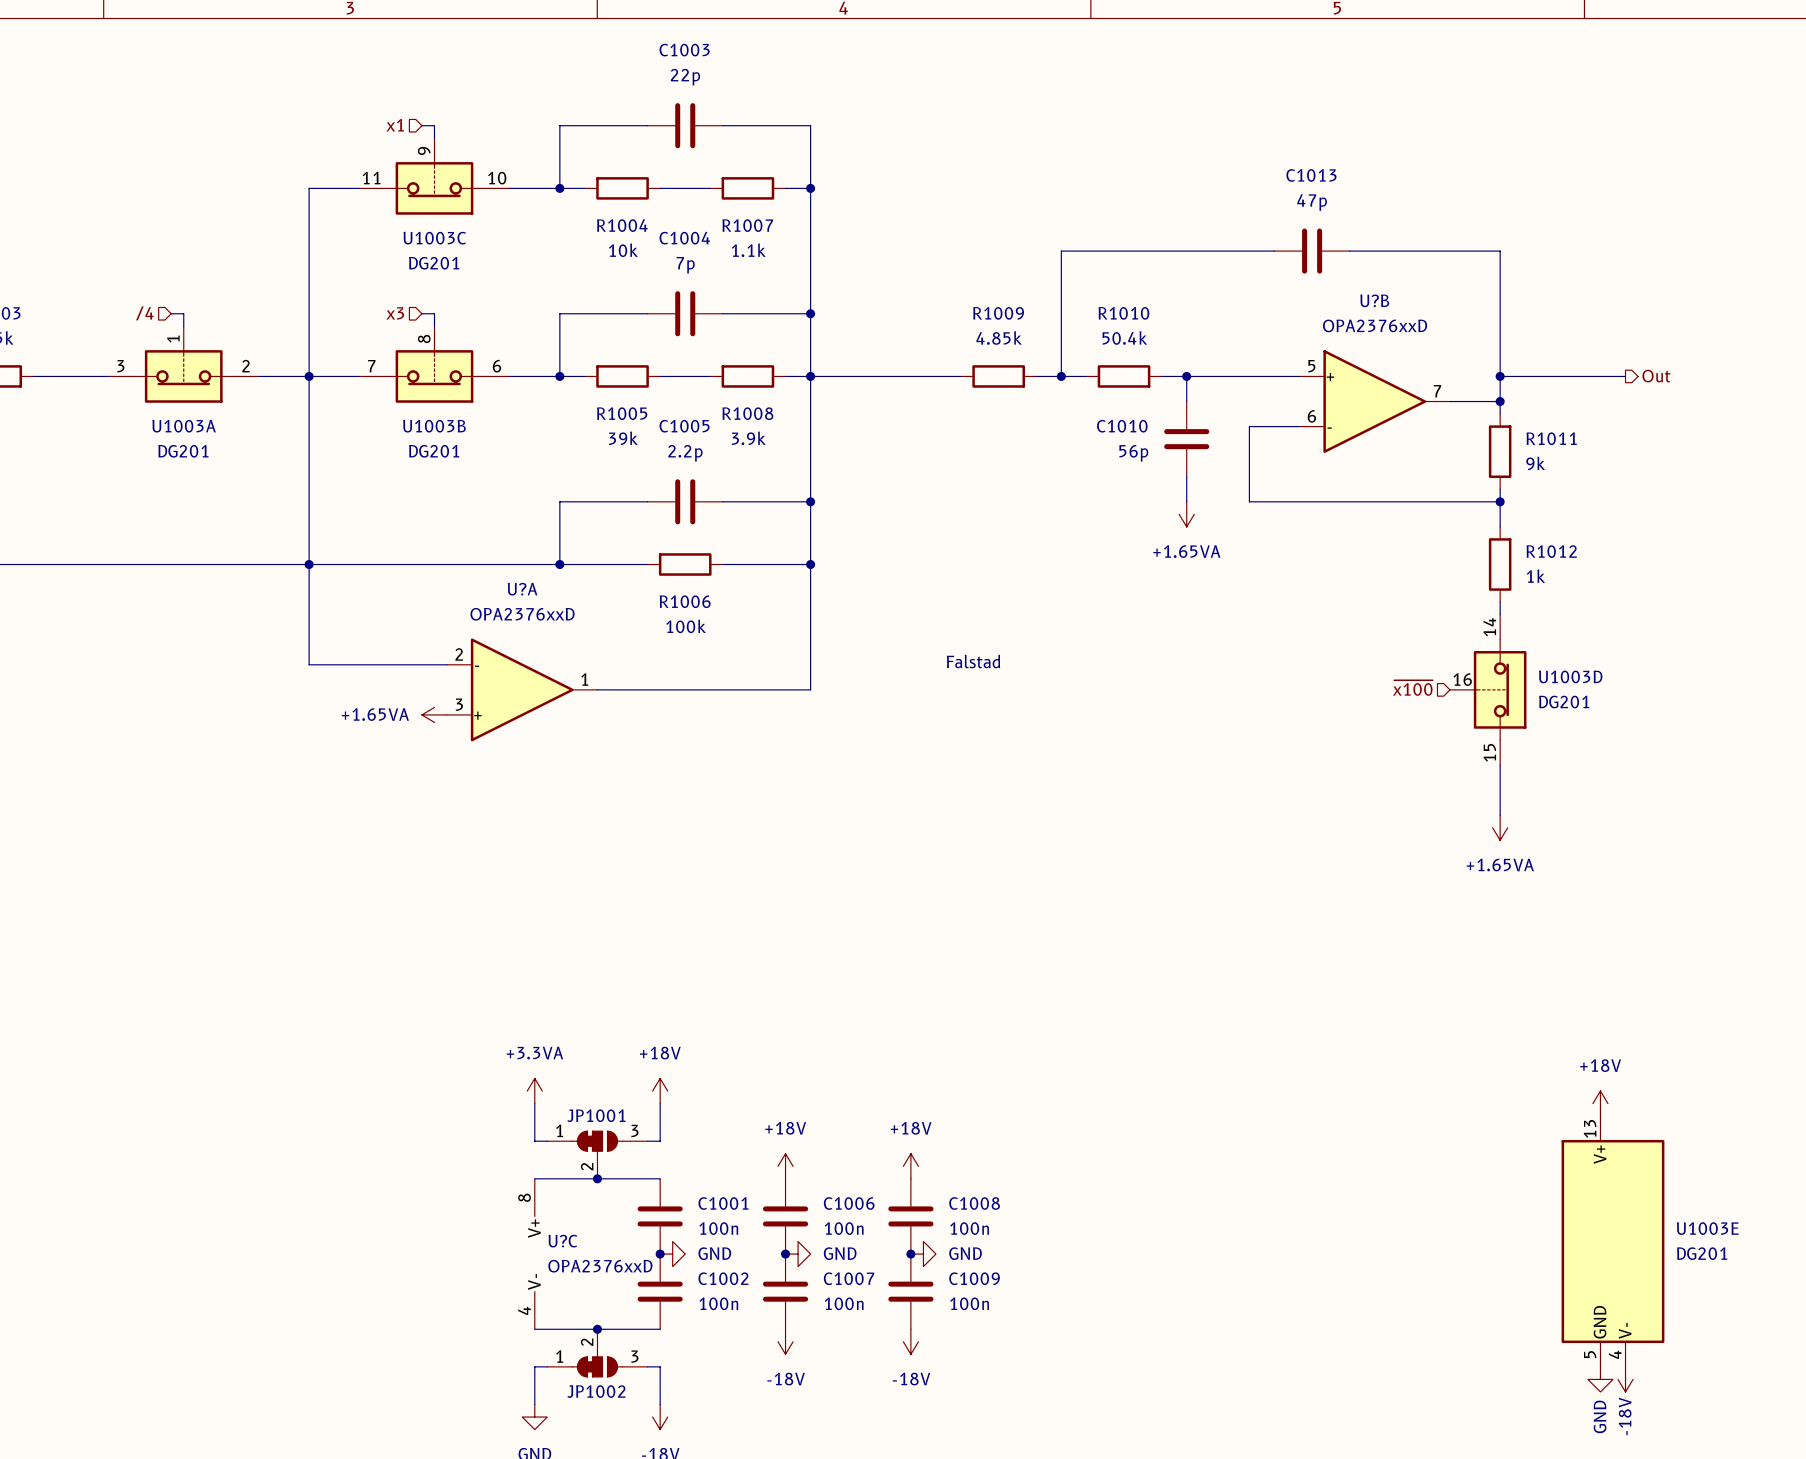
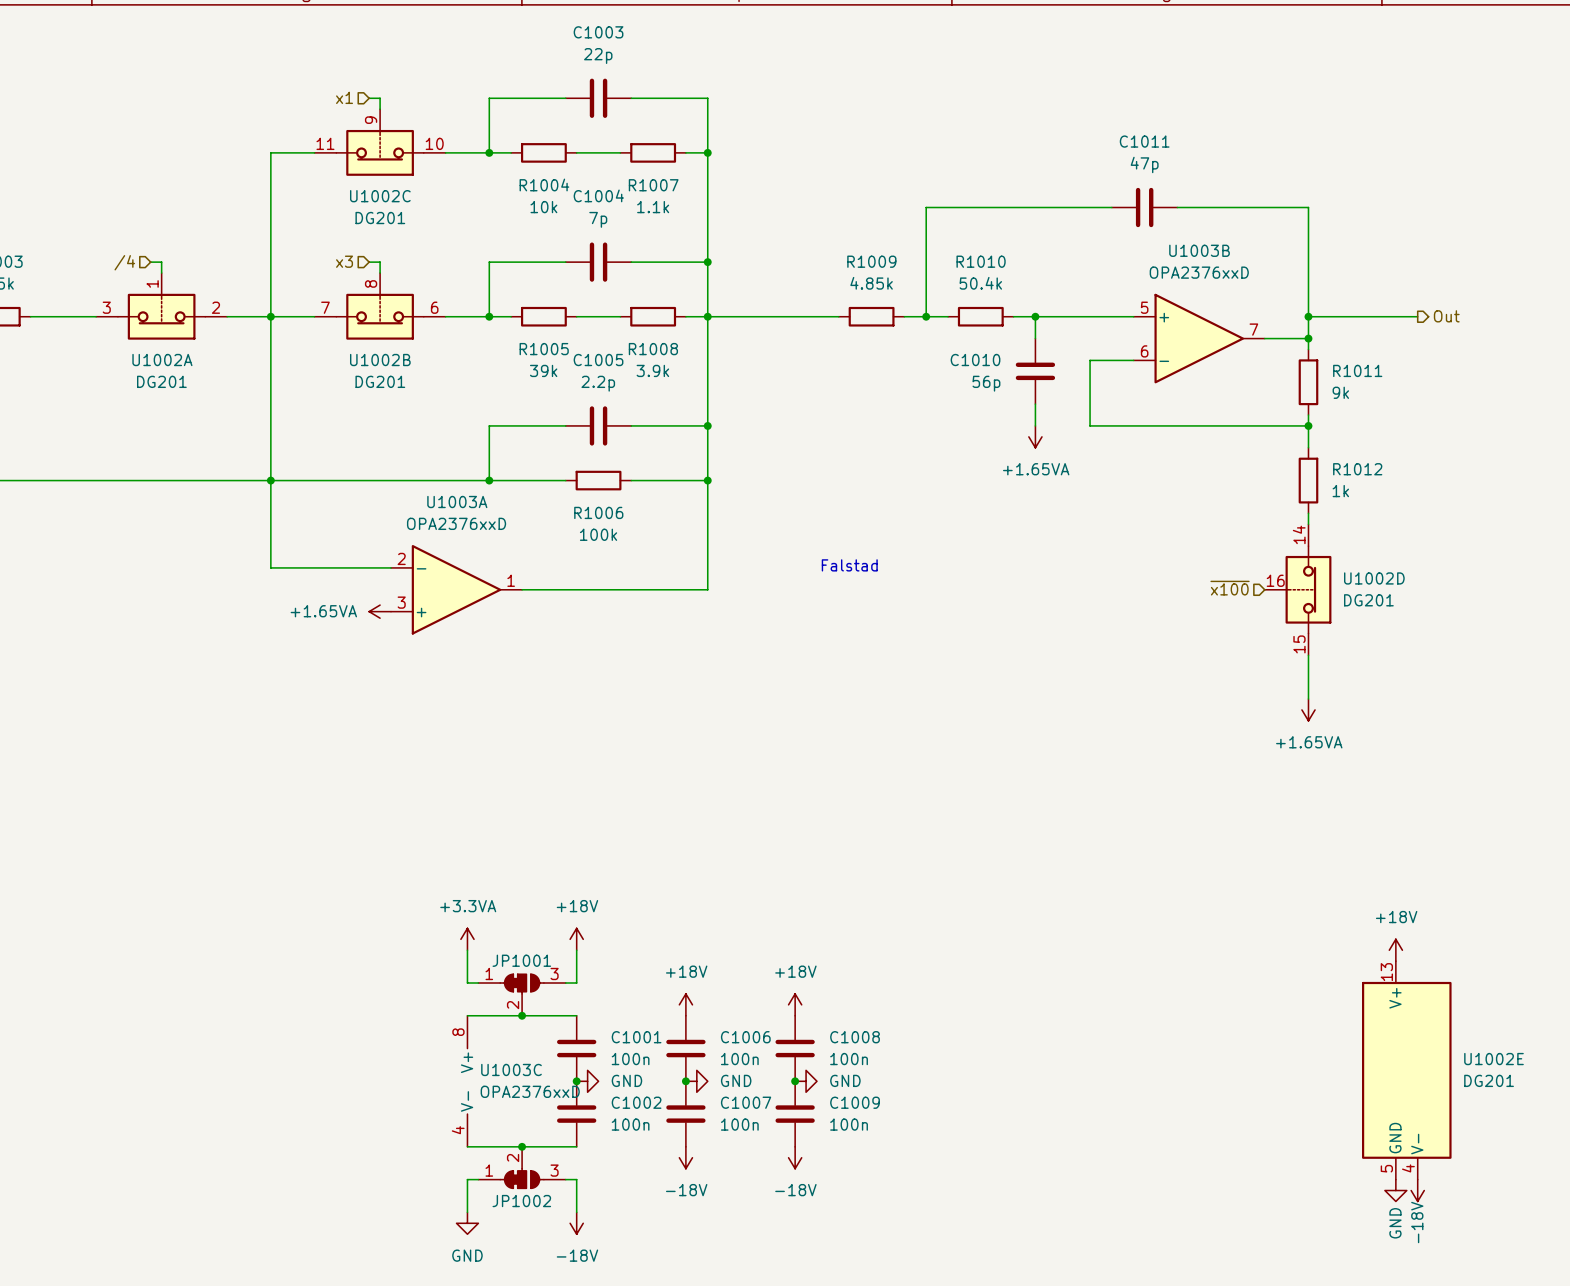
C1013 name: C1013 (1311, 175) -> C1011 (1144, 141)
U1003C name: U1003C (434, 238) -> U1002C (380, 196)
U?B name: U?B (1374, 300) -> U1003B (1199, 250)
U1003A name: U1003A (184, 426) -> U1002A (162, 360)
U1003B name: U1003B (434, 426) -> U1002B (380, 360)
U?A name: U?A (522, 589) -> U1003A (457, 502)
U1003D name: U1003D (1570, 676) -> U1002D (1374, 578)
U1003E name: U1003E (1707, 1228) -> U1002E (1493, 1059)
U?C name: U?C (562, 1241) -> U1003C (511, 1069)

